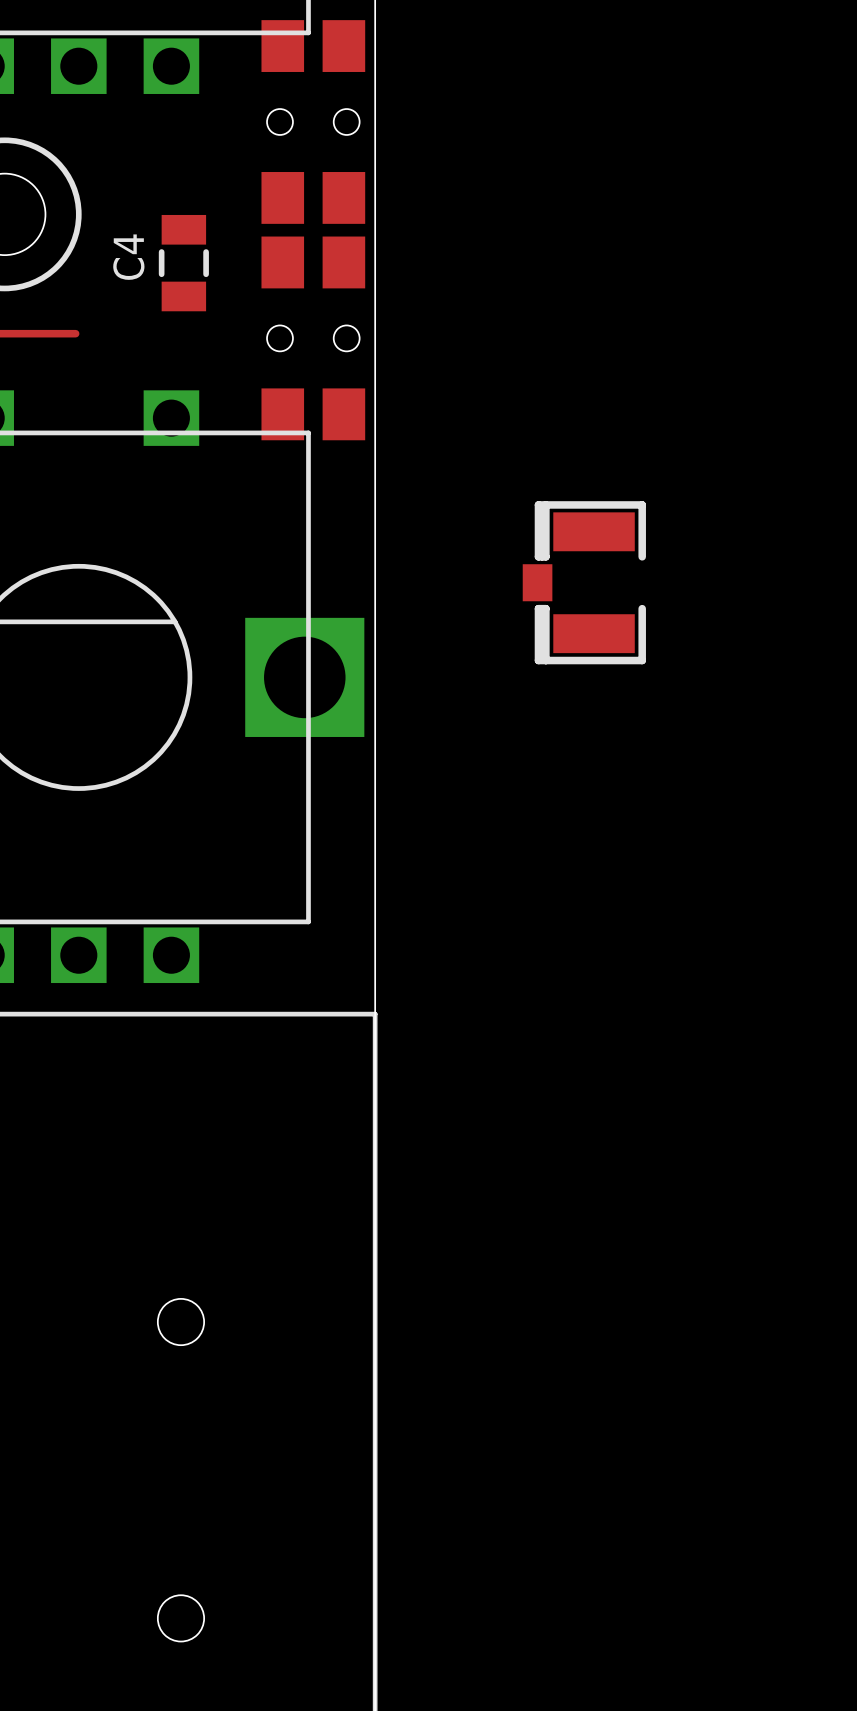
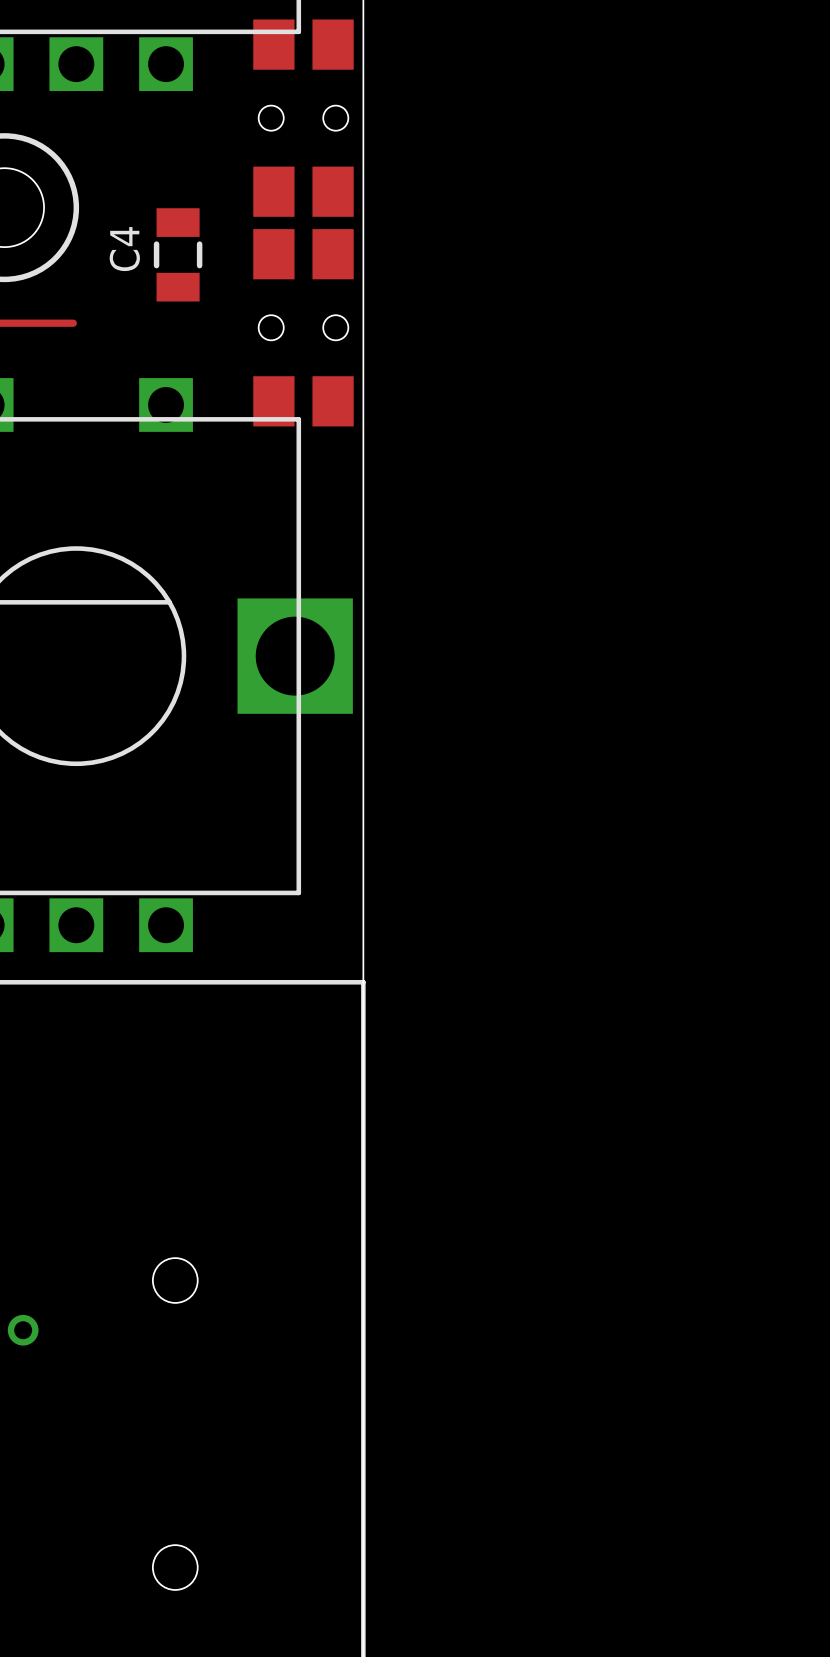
part: (584, 582) -> none
via: none -> (23, 1330)

